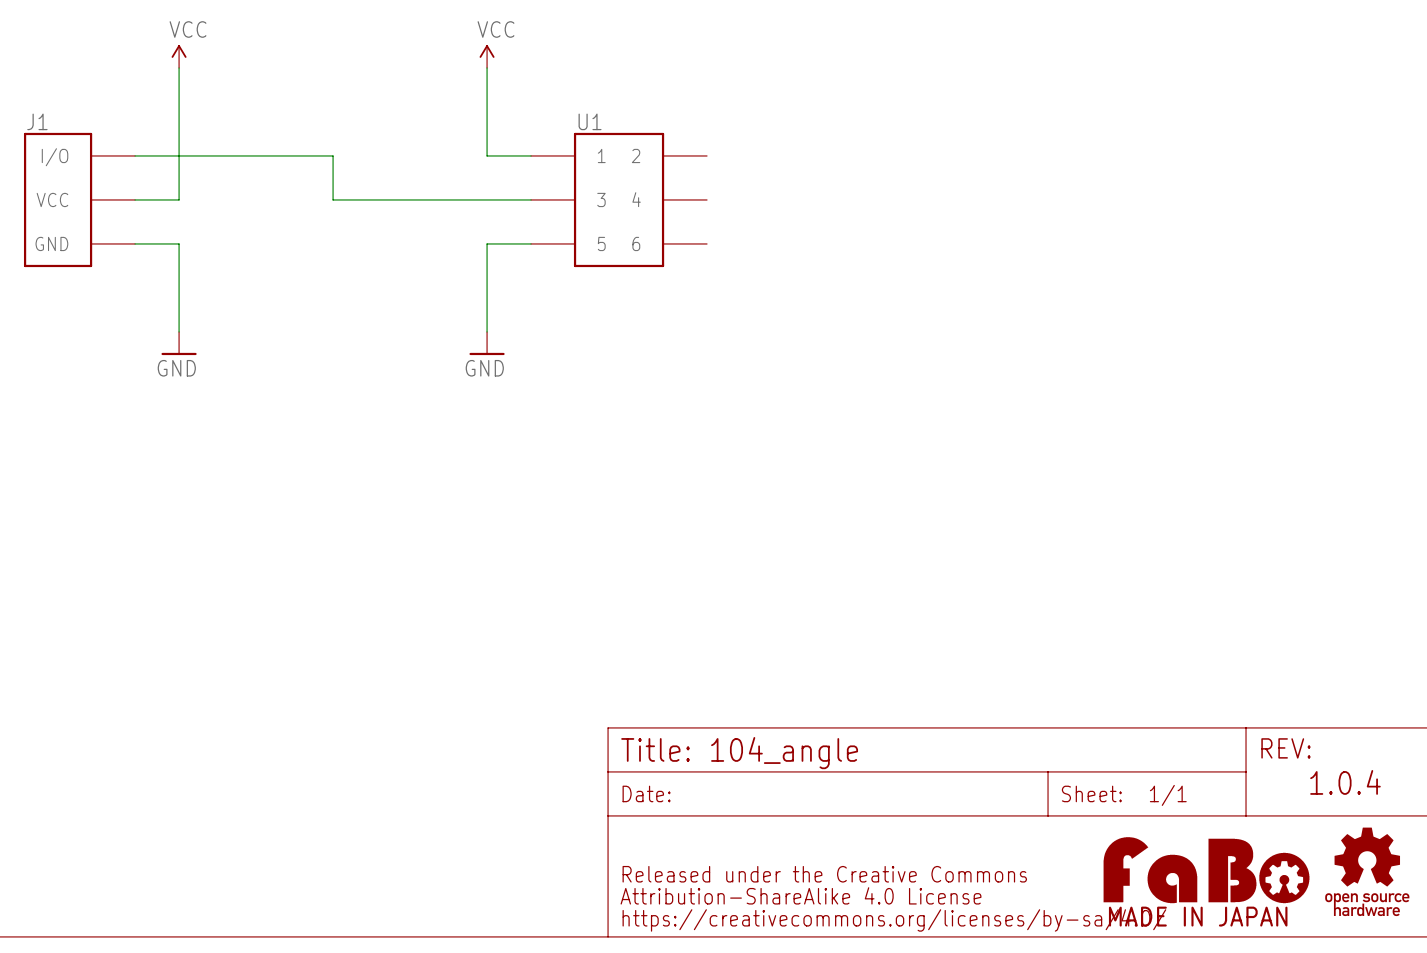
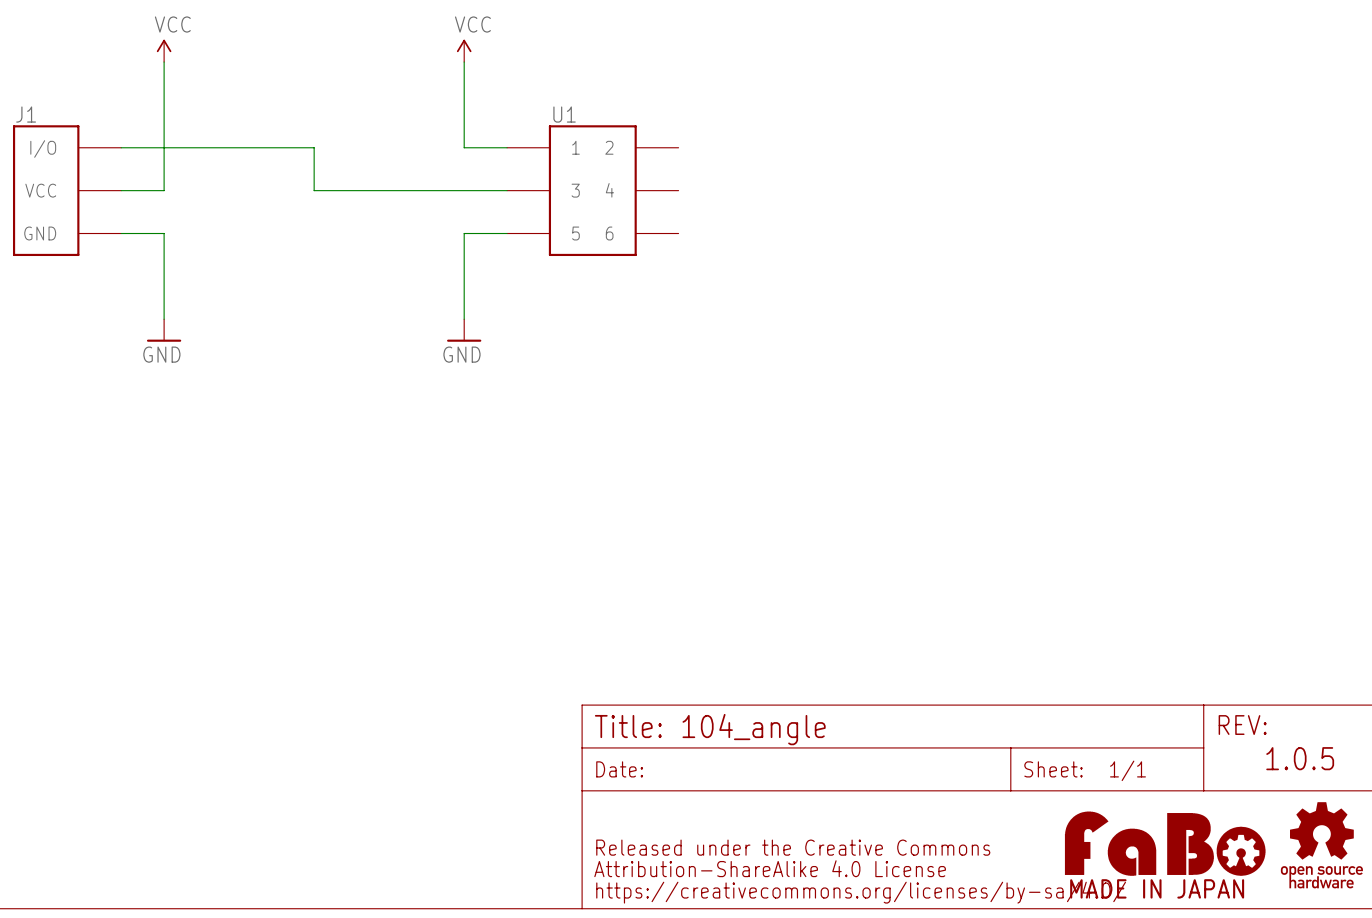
text: 1.0.4 (1345, 782) -> 1.0.5 (1300, 758)

